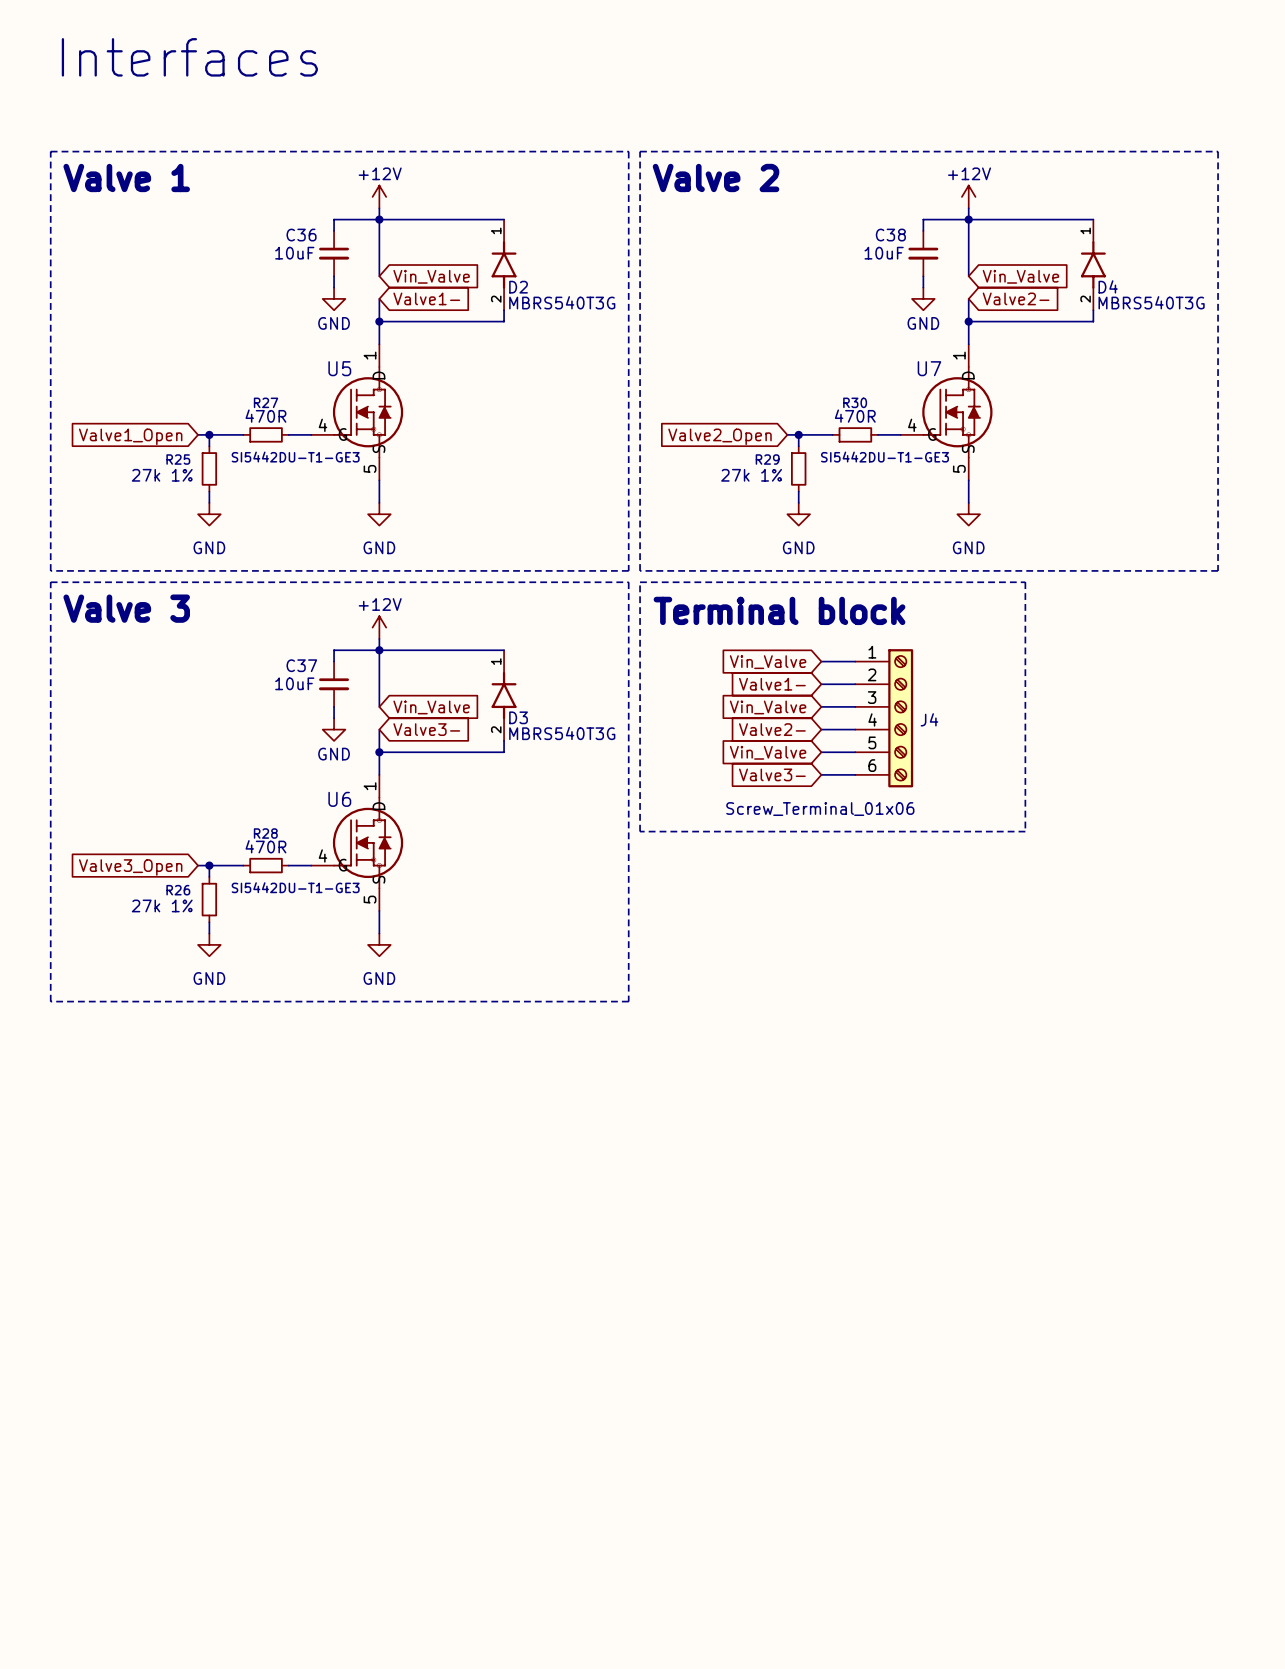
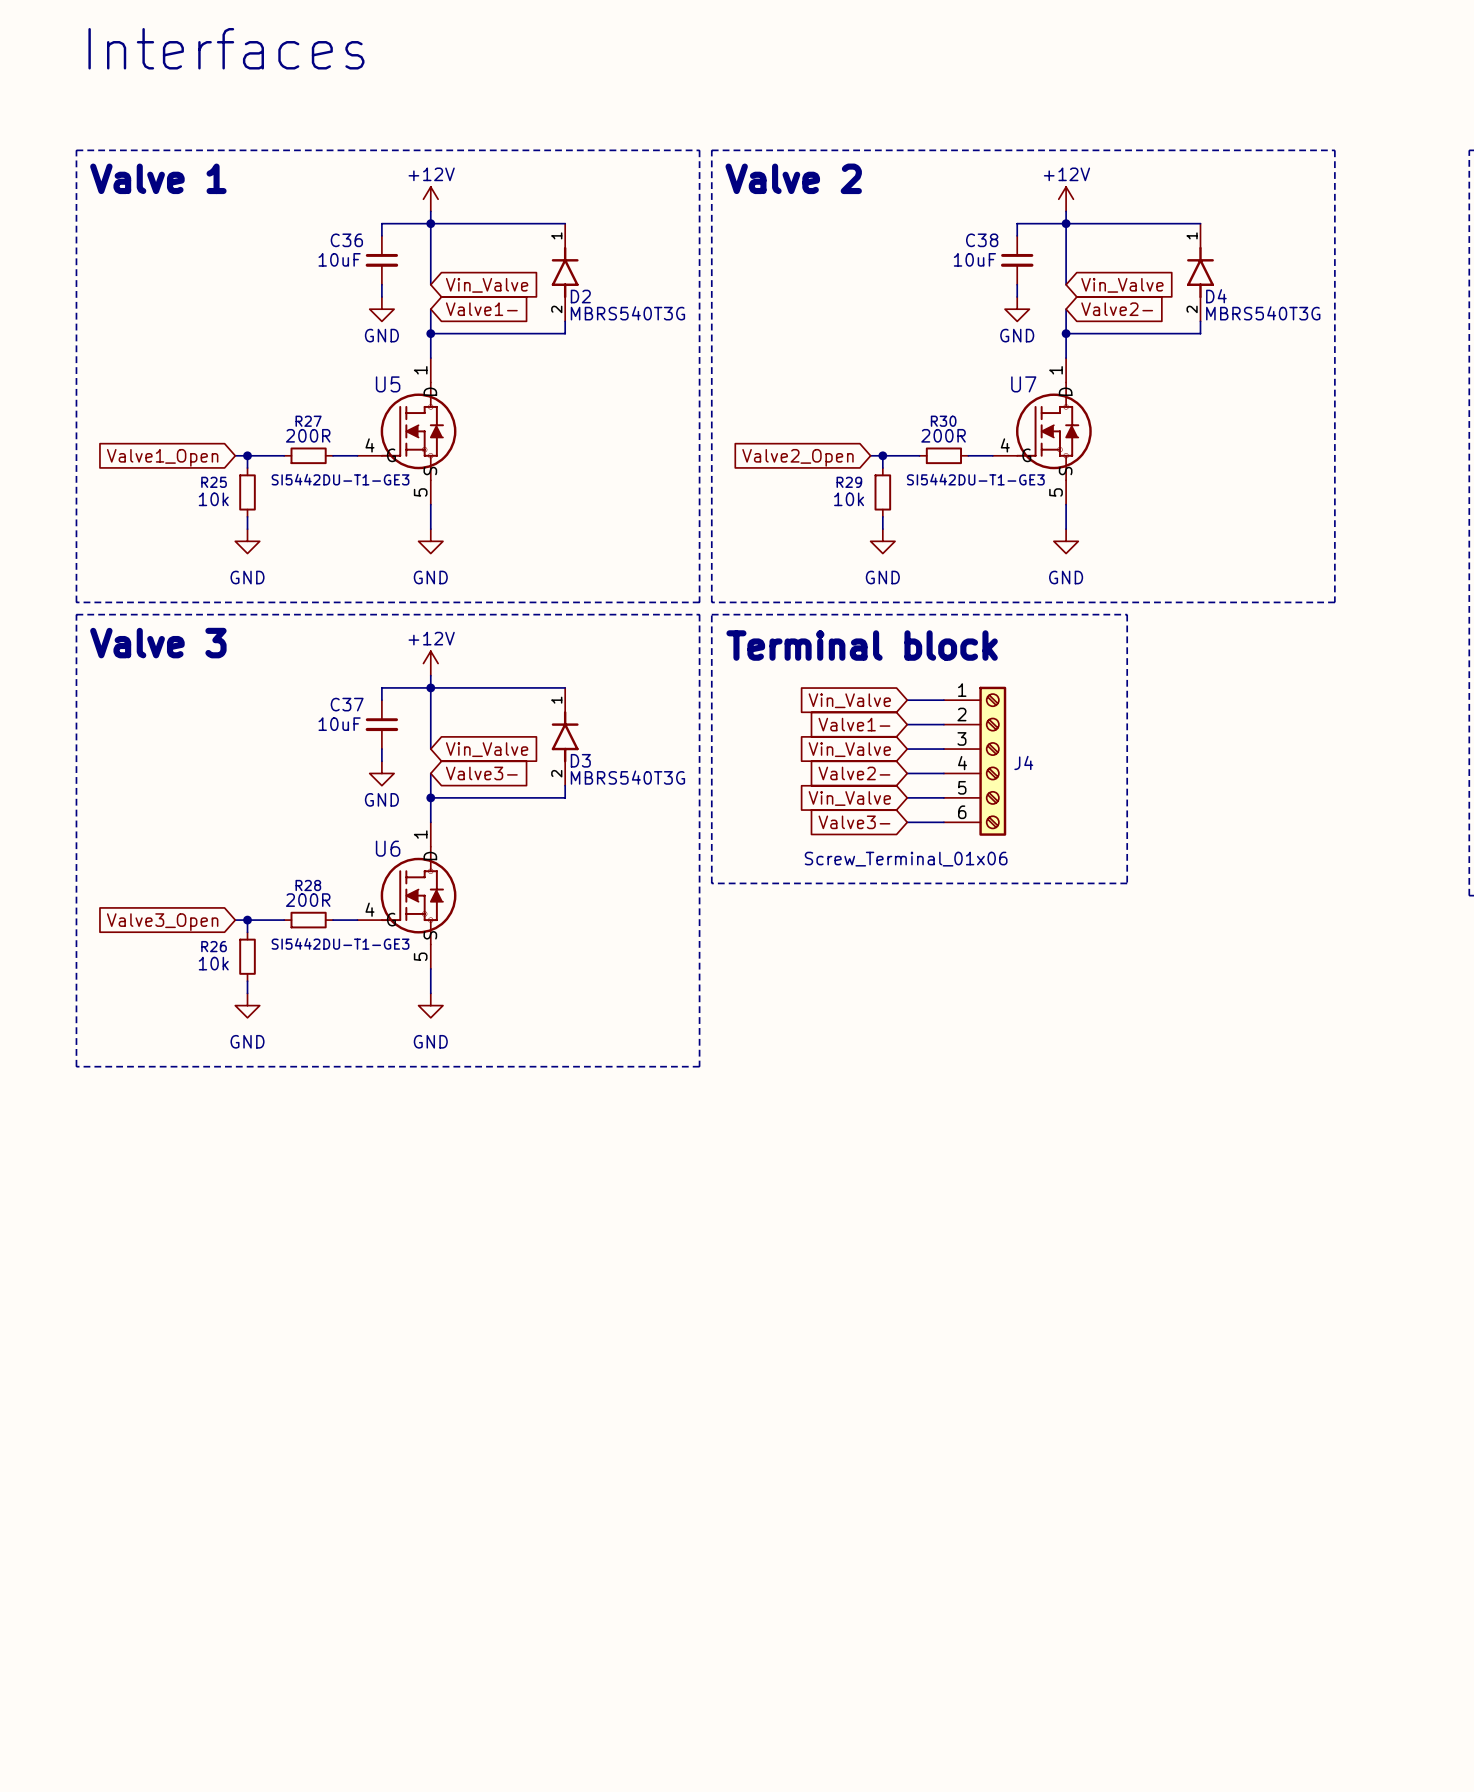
R27 value: 470R (265, 416) -> 200R (308, 435)
R30 value: 470R (855, 416) -> 200R (943, 435)
R25 value: 27k 1% (162, 475) -> 10k (213, 499)
R29 value: 27k 1% (751, 475) -> 10k (849, 499)
R28 value: 470R (265, 846) -> 200R (308, 900)
R26 value: 27k 1% (162, 905) -> 10k (213, 963)

